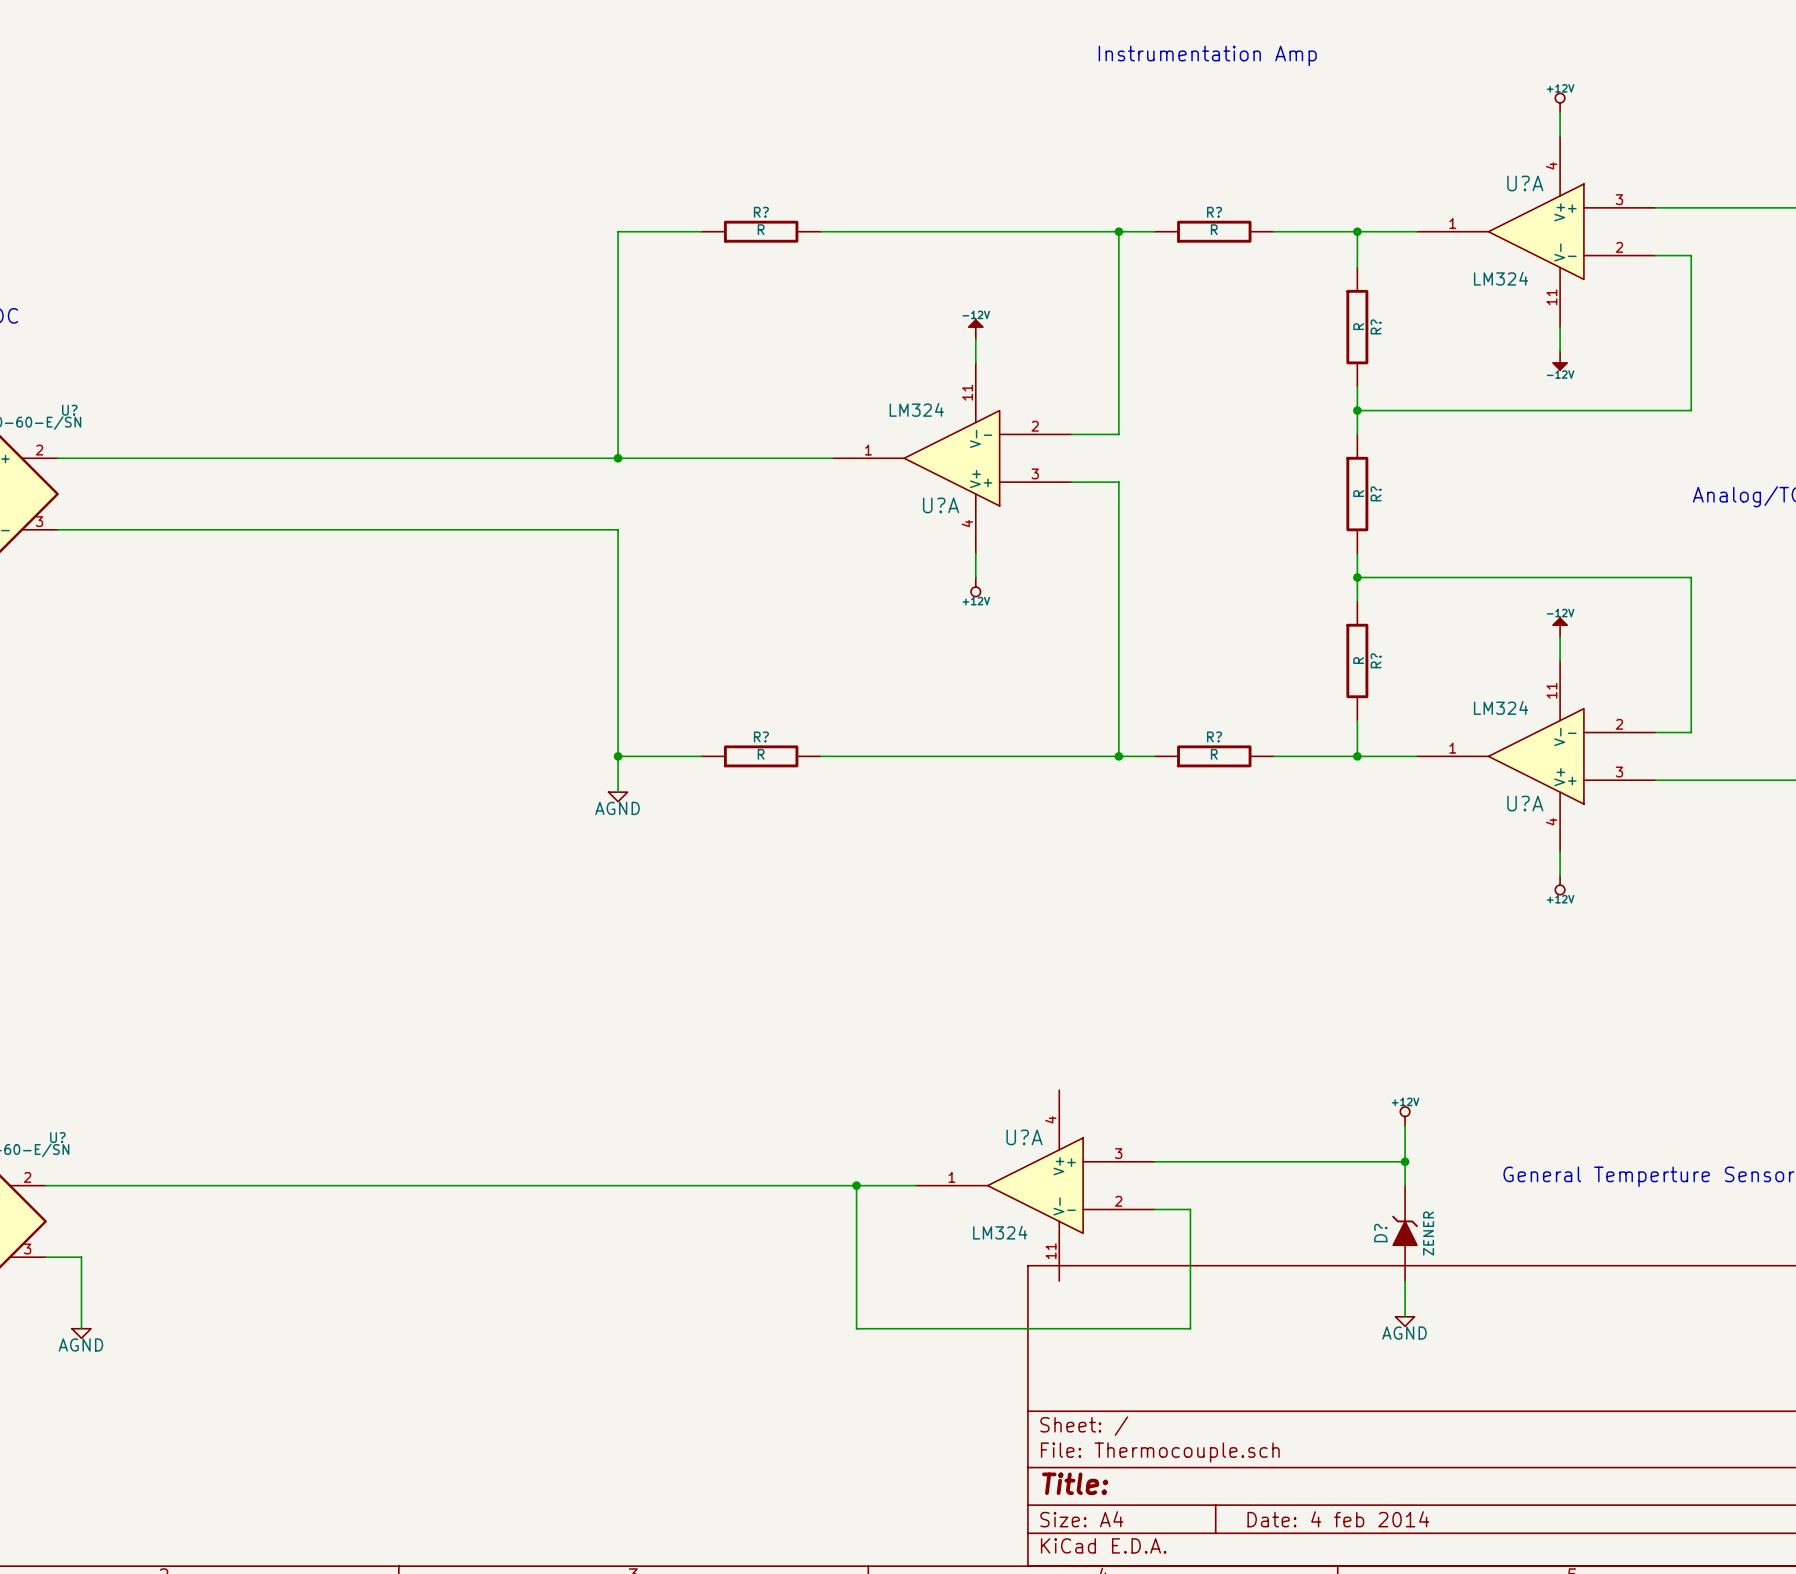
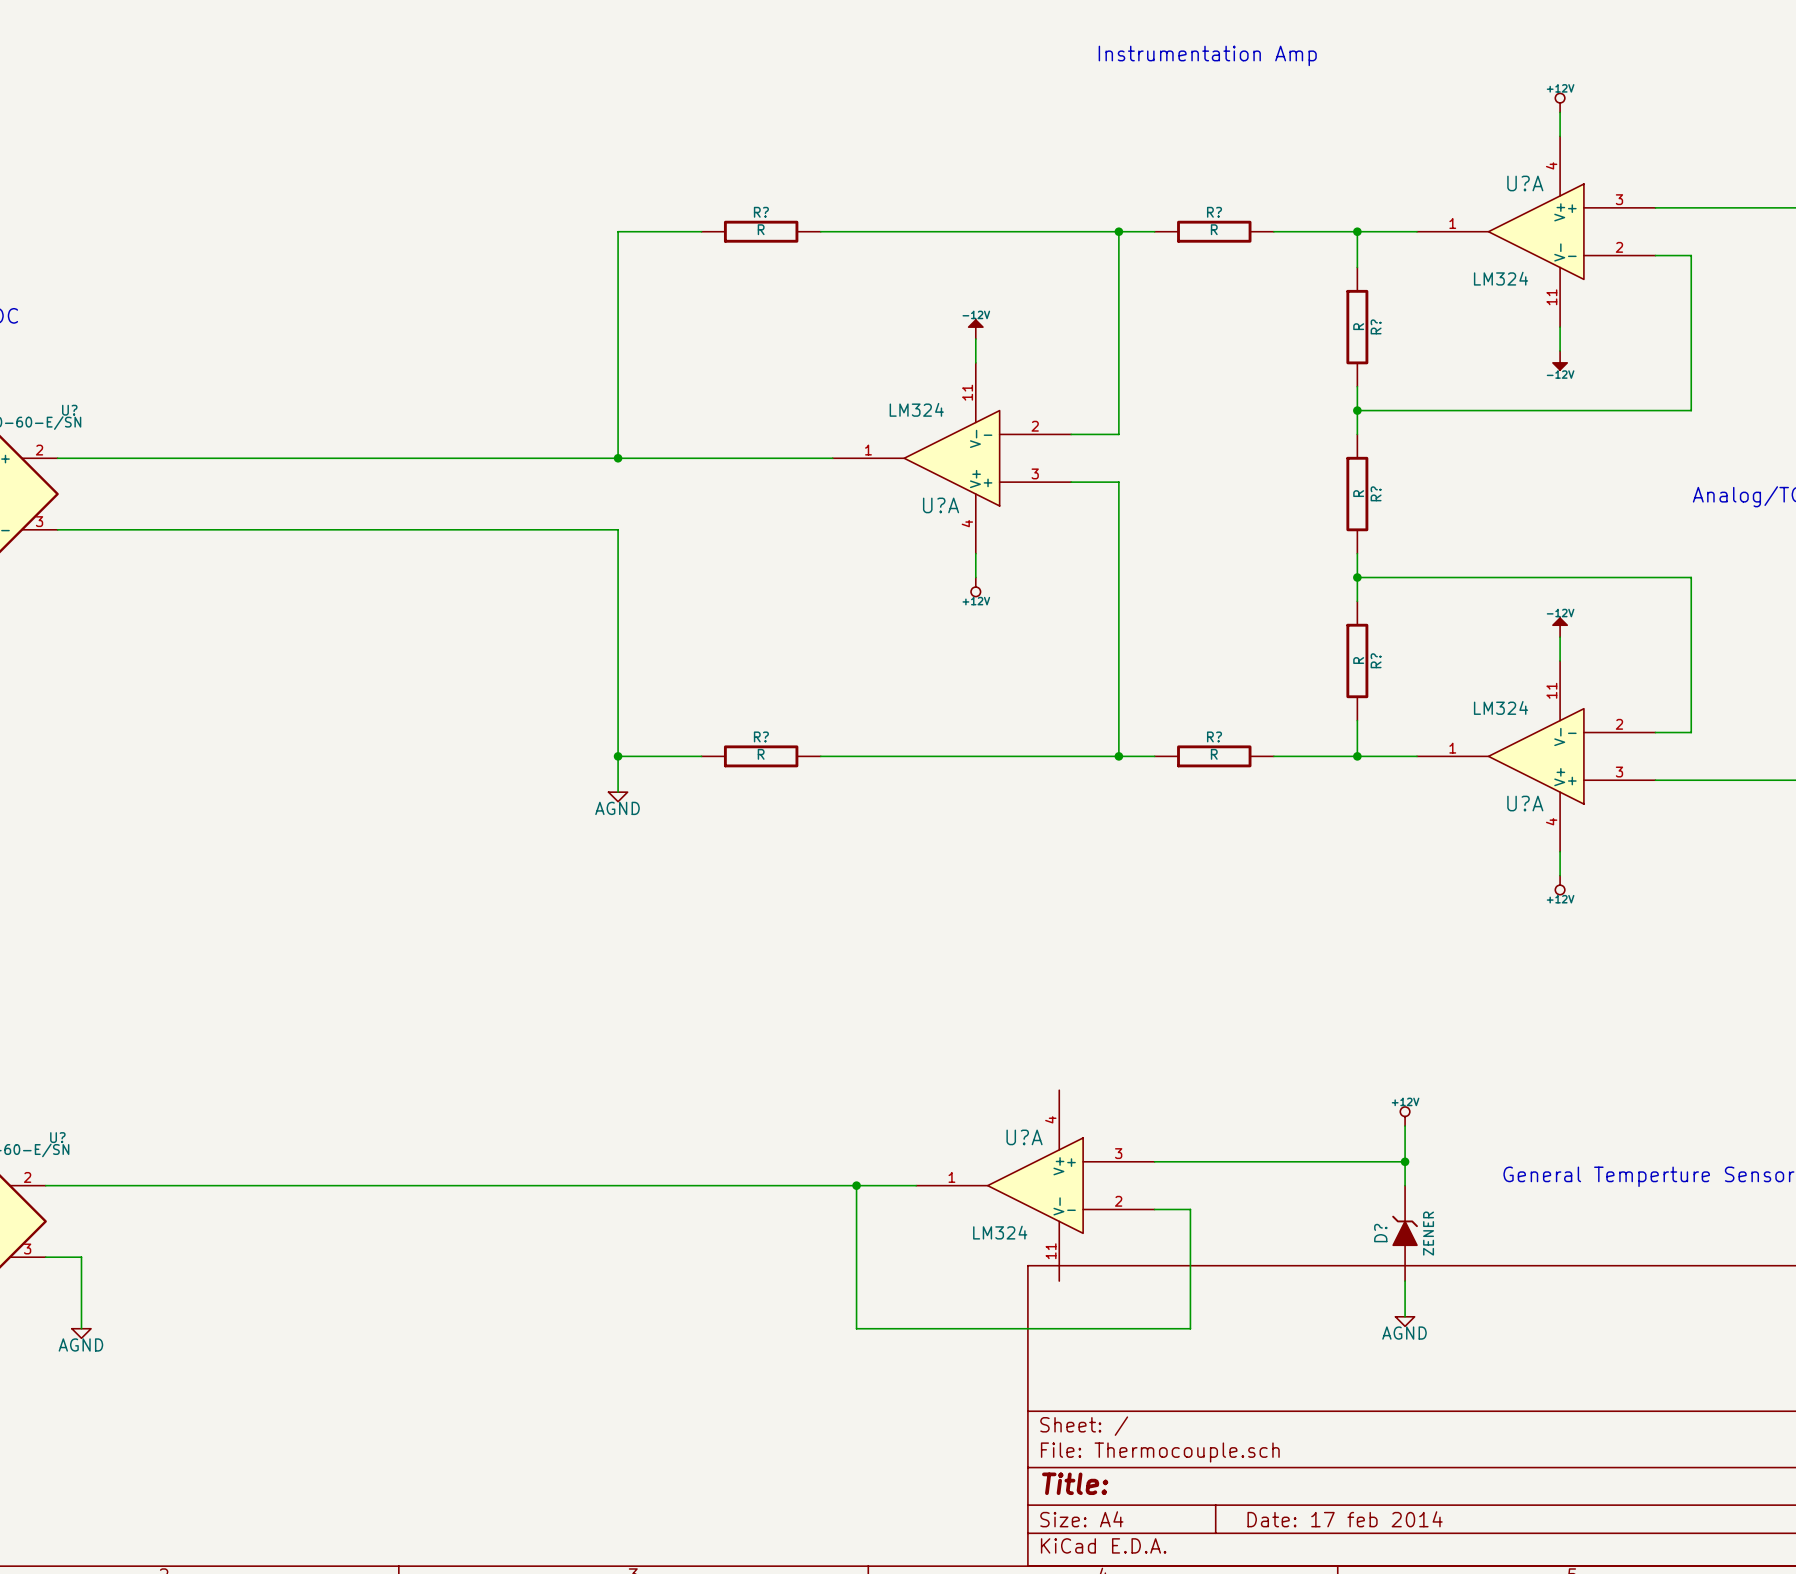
title block: Date: 4 feb 2014 (1338, 1519) -> Date: 17 feb 2014 (1345, 1519)

